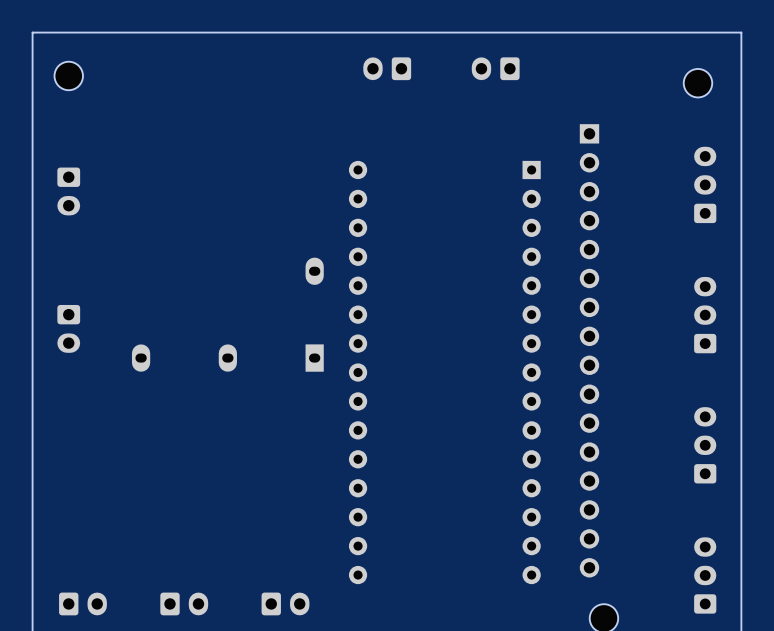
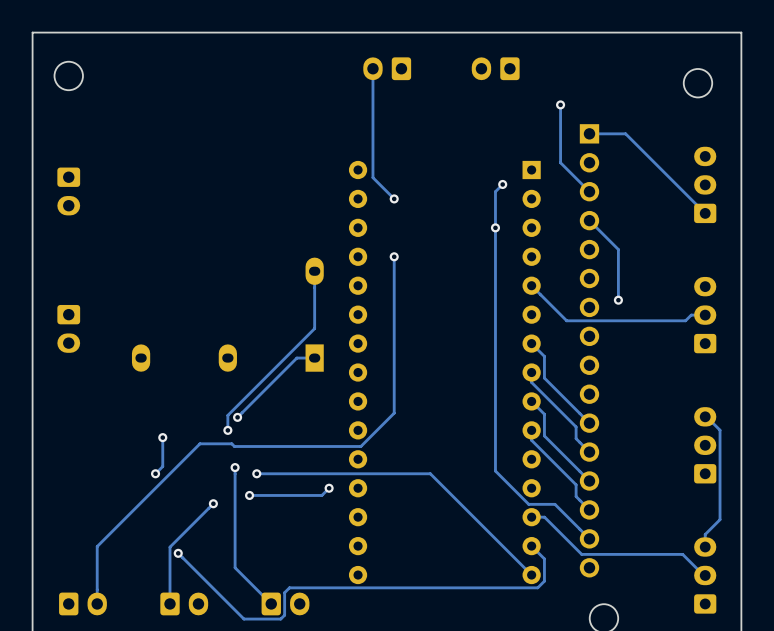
track: none -> (372, 68) (372, 177) (394, 198)
track: none -> (560, 104) (560, 162) (589, 191)
via: none -> (560, 104)
track: none -> (589, 133) (625, 133) (705, 213)
track: none -> (502, 184) (495, 191) (495, 471) (528, 504) (554, 504) (589, 538)
via: none -> (502, 184)
via: none -> (394, 198)
track: none -> (589, 220) (618, 249) (618, 300)
via: none -> (495, 227)
track: none -> (394, 256) (394, 413) (360, 446) (234, 446) (231, 443) (199, 443) (97, 546) (97, 603)
via: none -> (394, 256)
track: none -> (314, 271) (314, 328) (227, 415) (227, 430)
track: none -> (531, 285) (566, 320) (685, 320) (691, 315) (705, 315)
via: none -> (618, 300)
track: none -> (531, 343) (544, 356) (544, 378) (589, 423)
track: none -> (314, 358) (296, 358) (237, 417)
track: none -> (531, 372) (531, 382) (576, 426) (576, 438) (589, 452)
track: none -> (531, 401) (544, 414) (544, 435) (589, 481)
track: none -> (705, 416) (720, 430) (720, 519) (705, 534) (705, 547)
via: none -> (237, 417)
via: none -> (227, 430)
track: none -> (531, 430) (531, 440) (576, 484) (576, 496) (589, 509)
track: none -> (162, 437) (162, 466) (155, 473)
via: none -> (162, 437)
track: none -> (235, 467) (235, 567) (271, 603)
via: none -> (235, 467)
via: none -> (155, 473)
track: none -> (256, 473) (430, 473) (531, 575)
via: none -> (256, 473)
track: none -> (329, 488) (321, 495) (249, 495)
via: none -> (329, 488)
via: none -> (249, 495)
track: none -> (213, 503) (170, 547) (170, 603)
via: none -> (213, 503)
track: none -> (531, 517) (544, 517) (581, 554) (682, 554) (705, 575)
track: none -> (531, 546) (544, 558) (544, 581) (537, 587) (289, 587) (284, 592) (284, 615) (280, 619) (243, 619) (178, 553)
via: none -> (178, 553)

